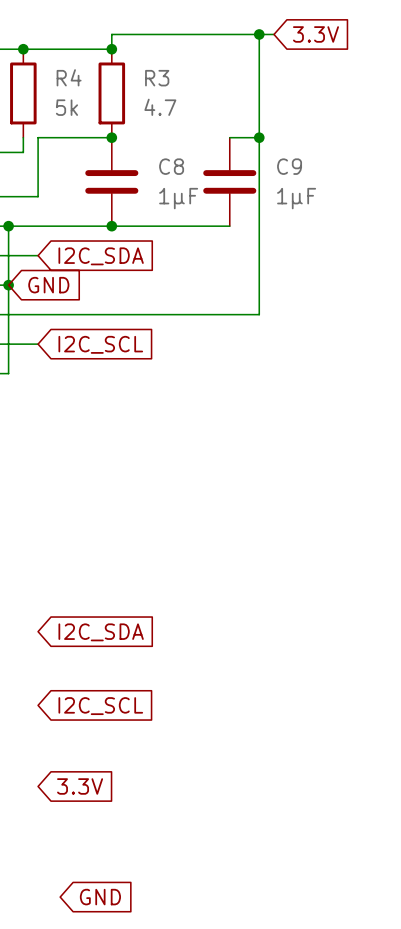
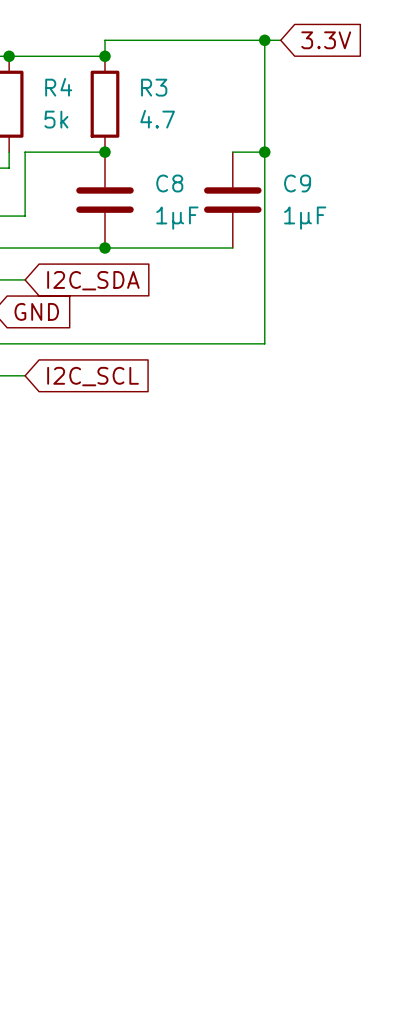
global label: I2C_SDA (101, 632) -> none
global label: I2C_SCL (100, 706) -> none
global label: 3.3V (80, 786) -> none
global label: GND (100, 897) -> none

